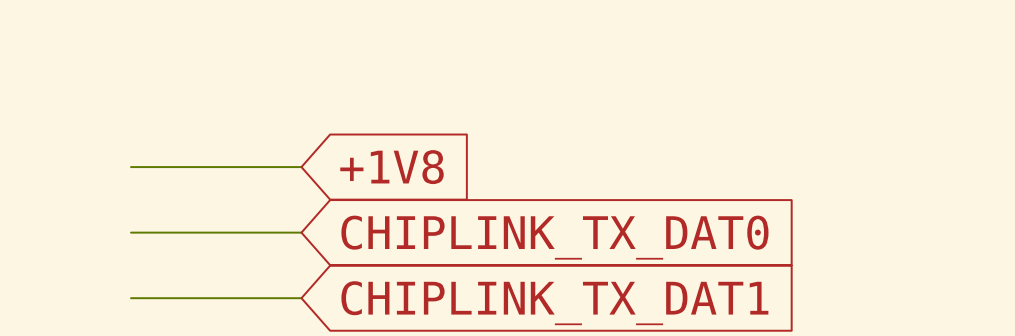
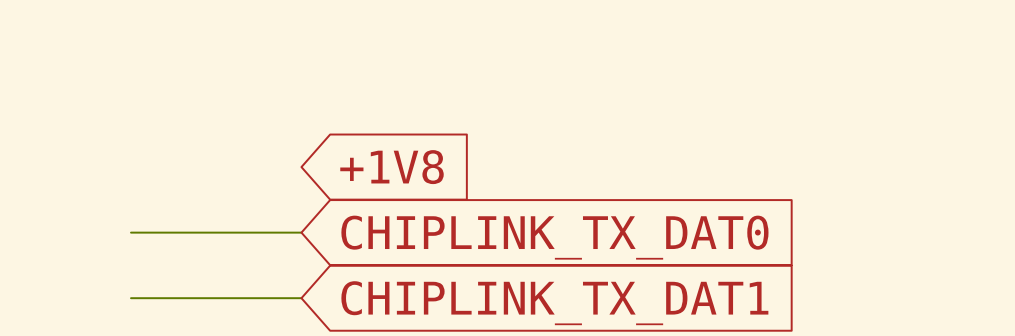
wire: (131, 167) (301, 167) -> none

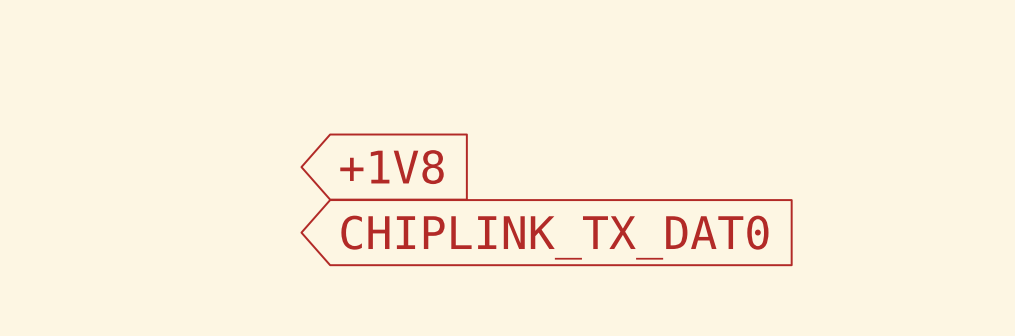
wire: (131, 232) (301, 232) -> none
wire: (131, 298) (301, 298) -> none
global label: CHIPLINK_TX_DAT1 (554, 303) -> none

